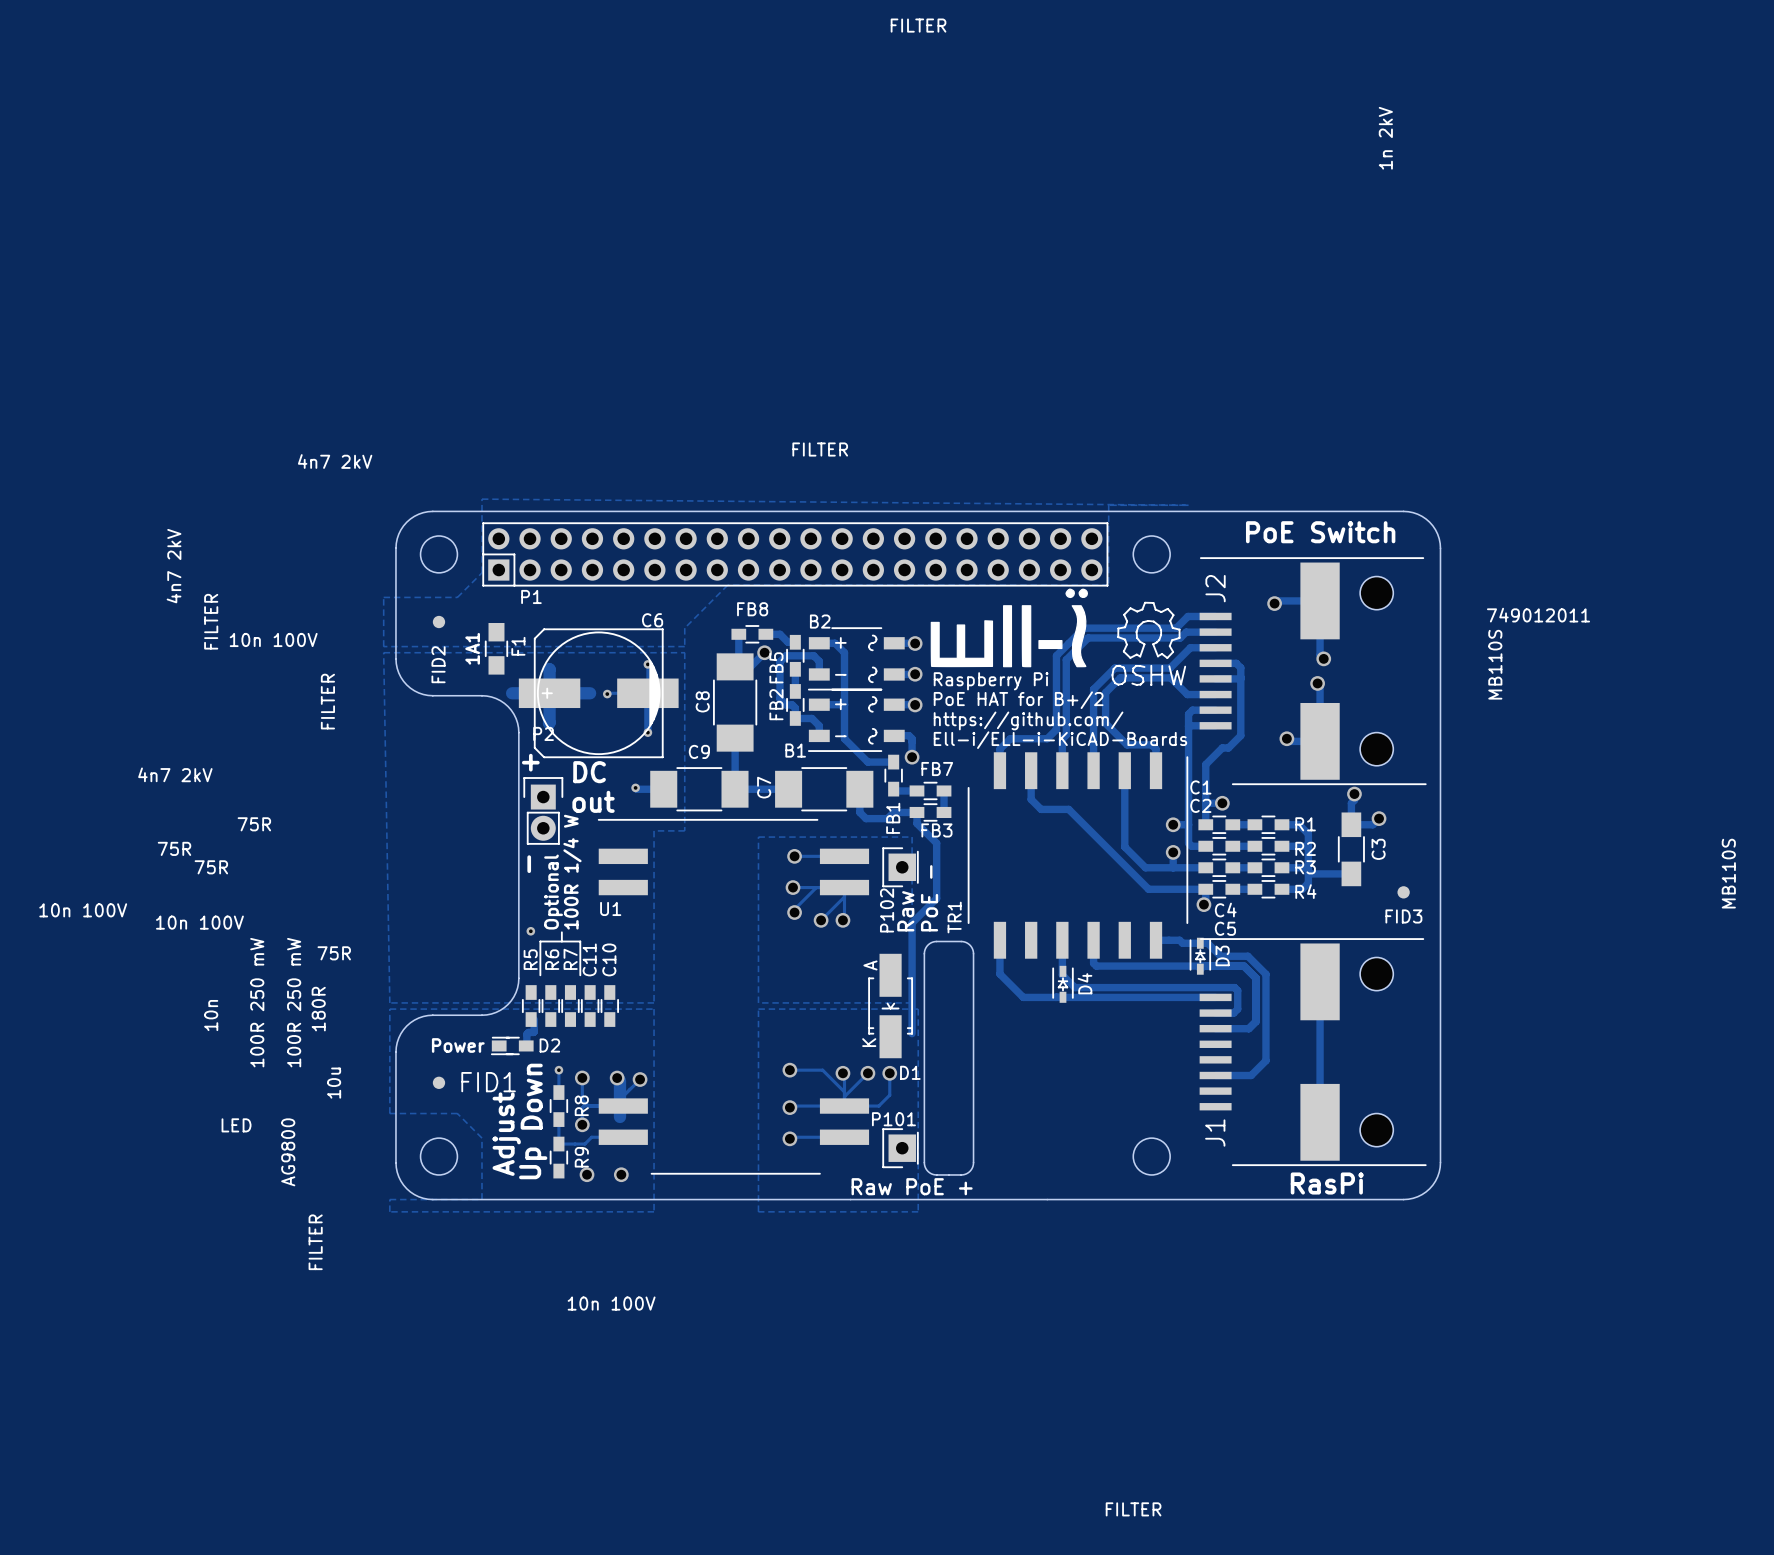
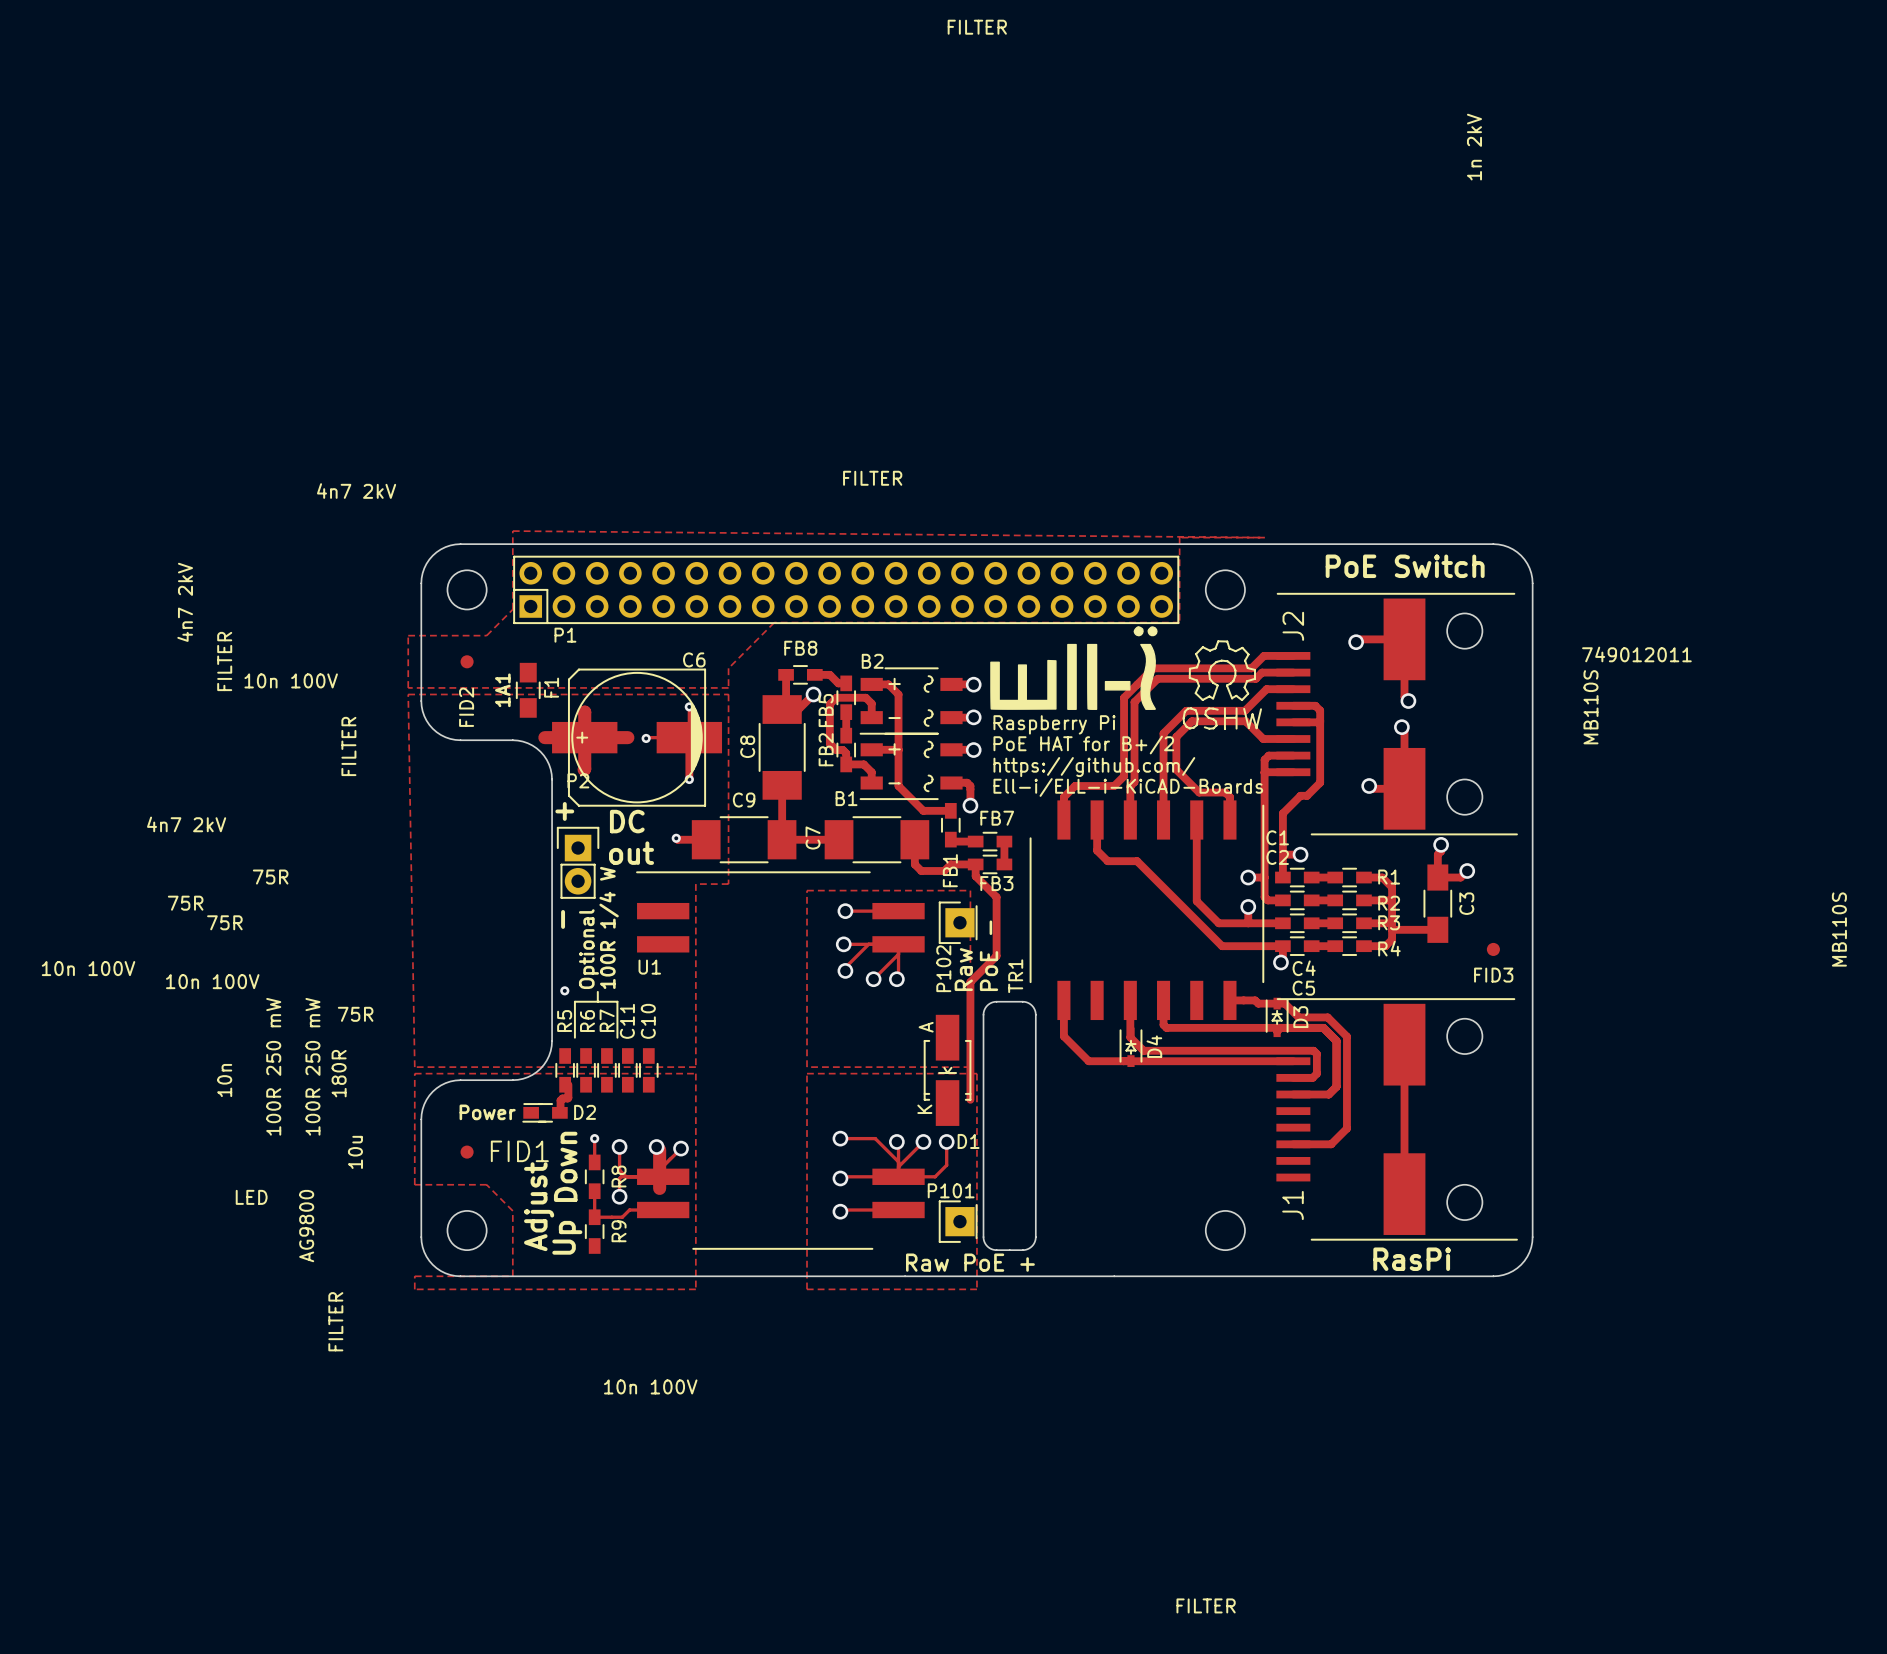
via: (587, 1174) -> none
via: (621, 1174) -> none

